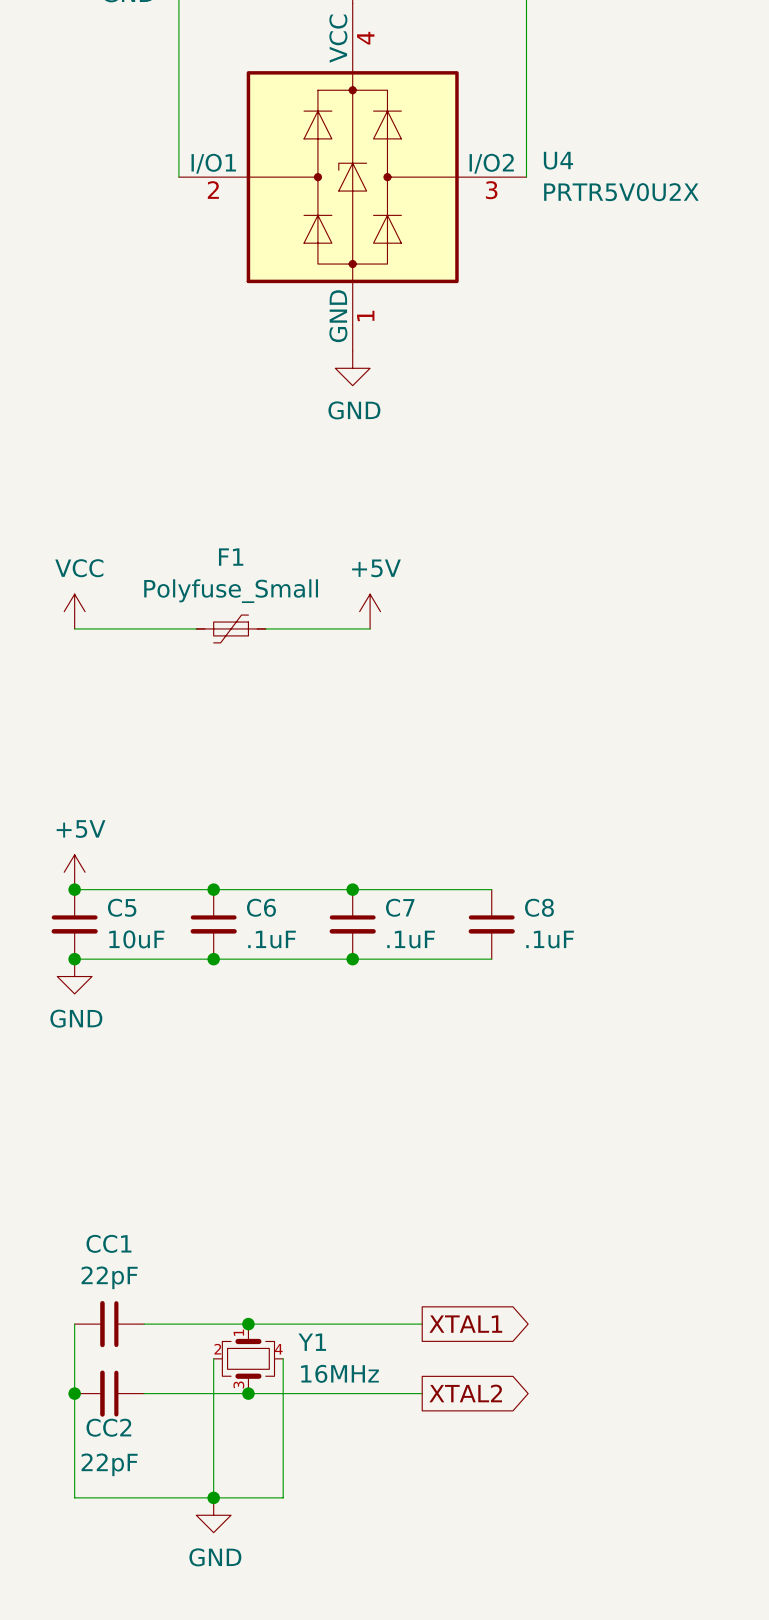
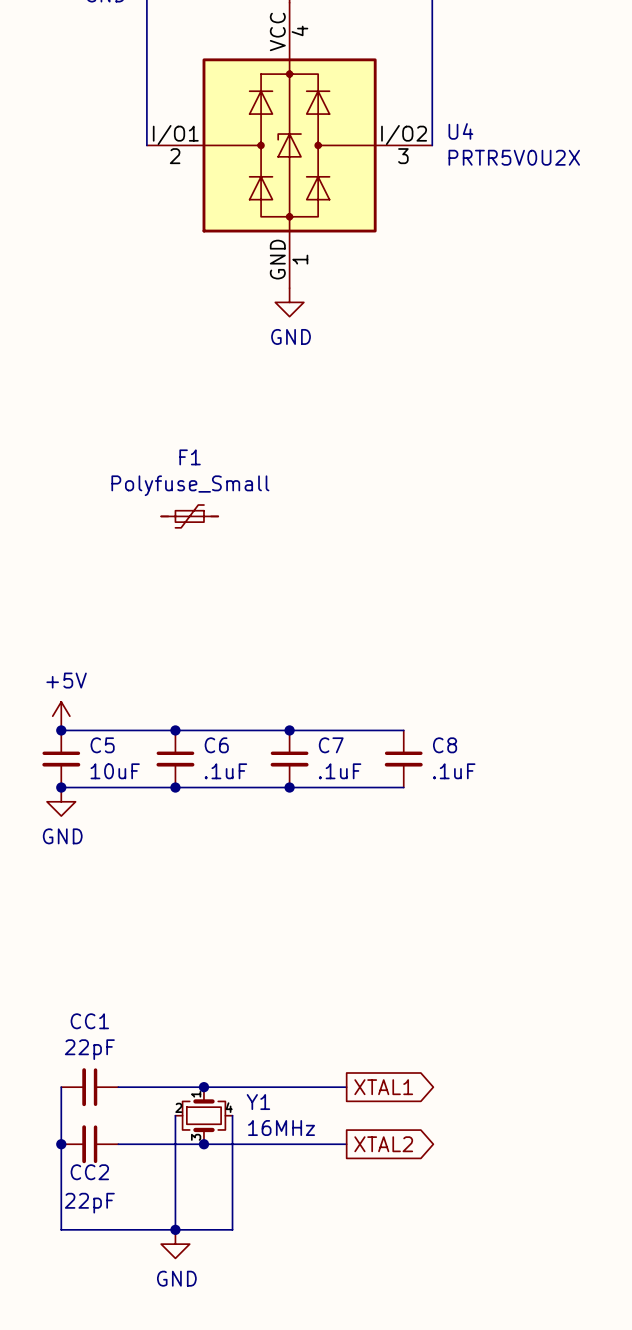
power symbol: VCC (74, 611) -> none
power symbol: +5V (370, 611) -> none
wire: (74, 628) (196, 628) -> none
wire: (265, 628) (370, 628) -> none

